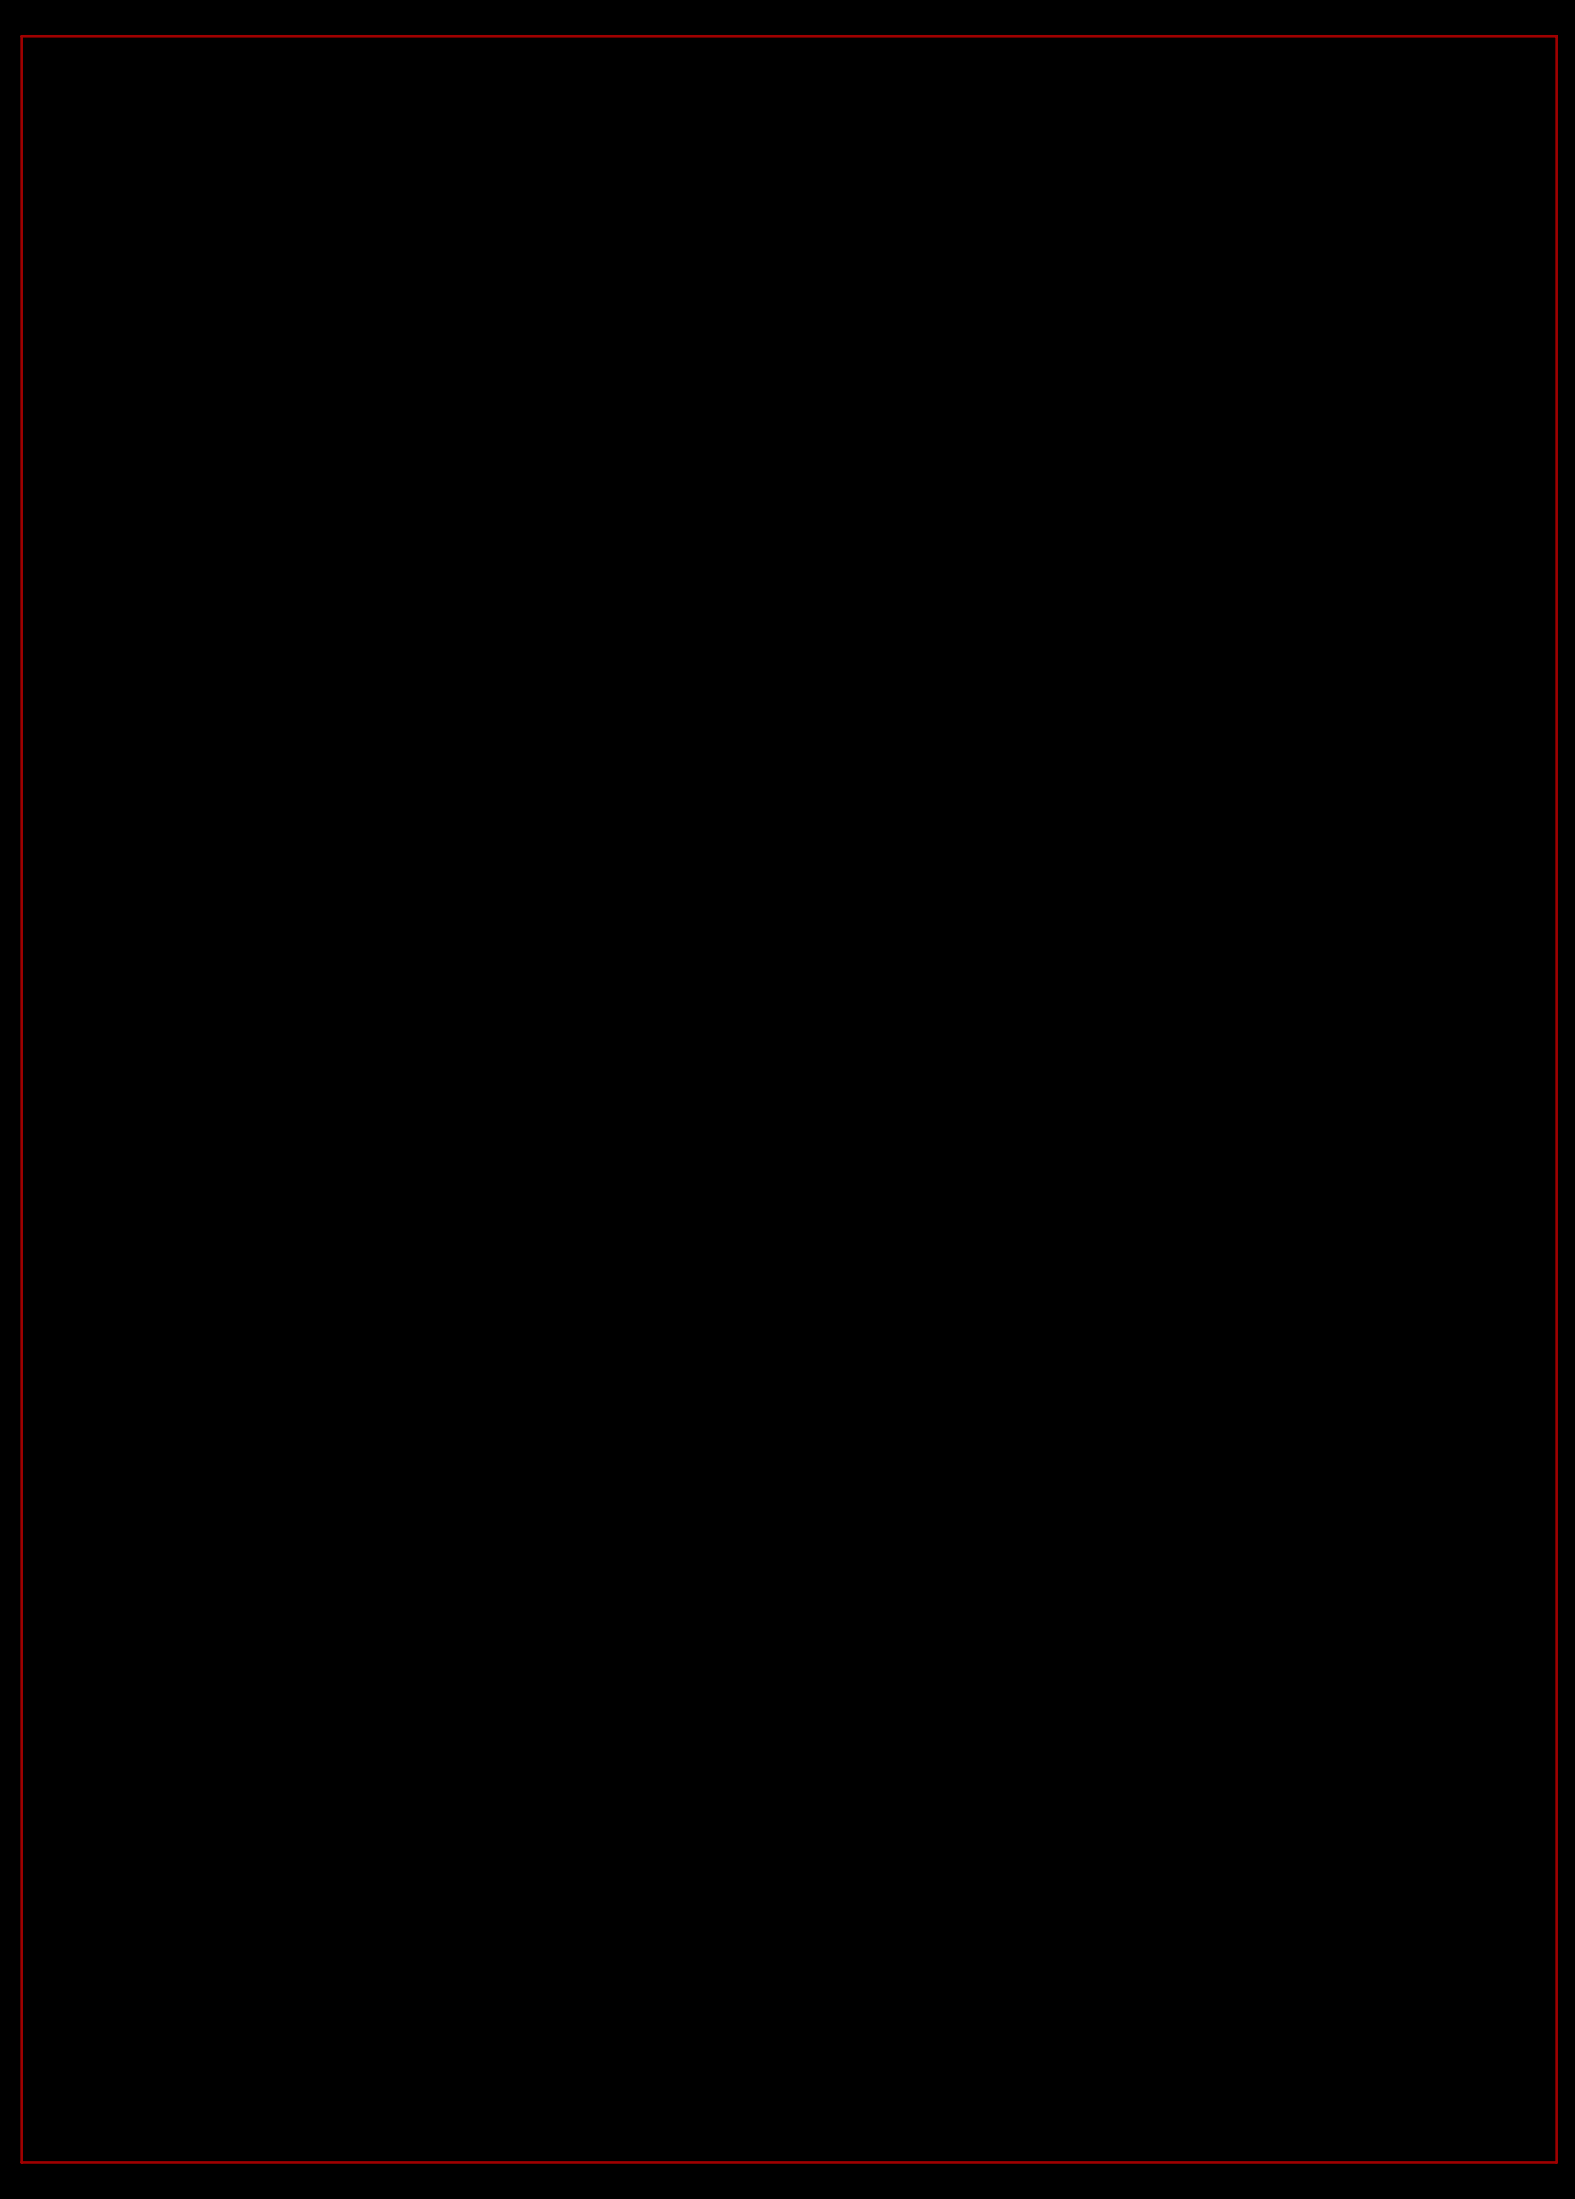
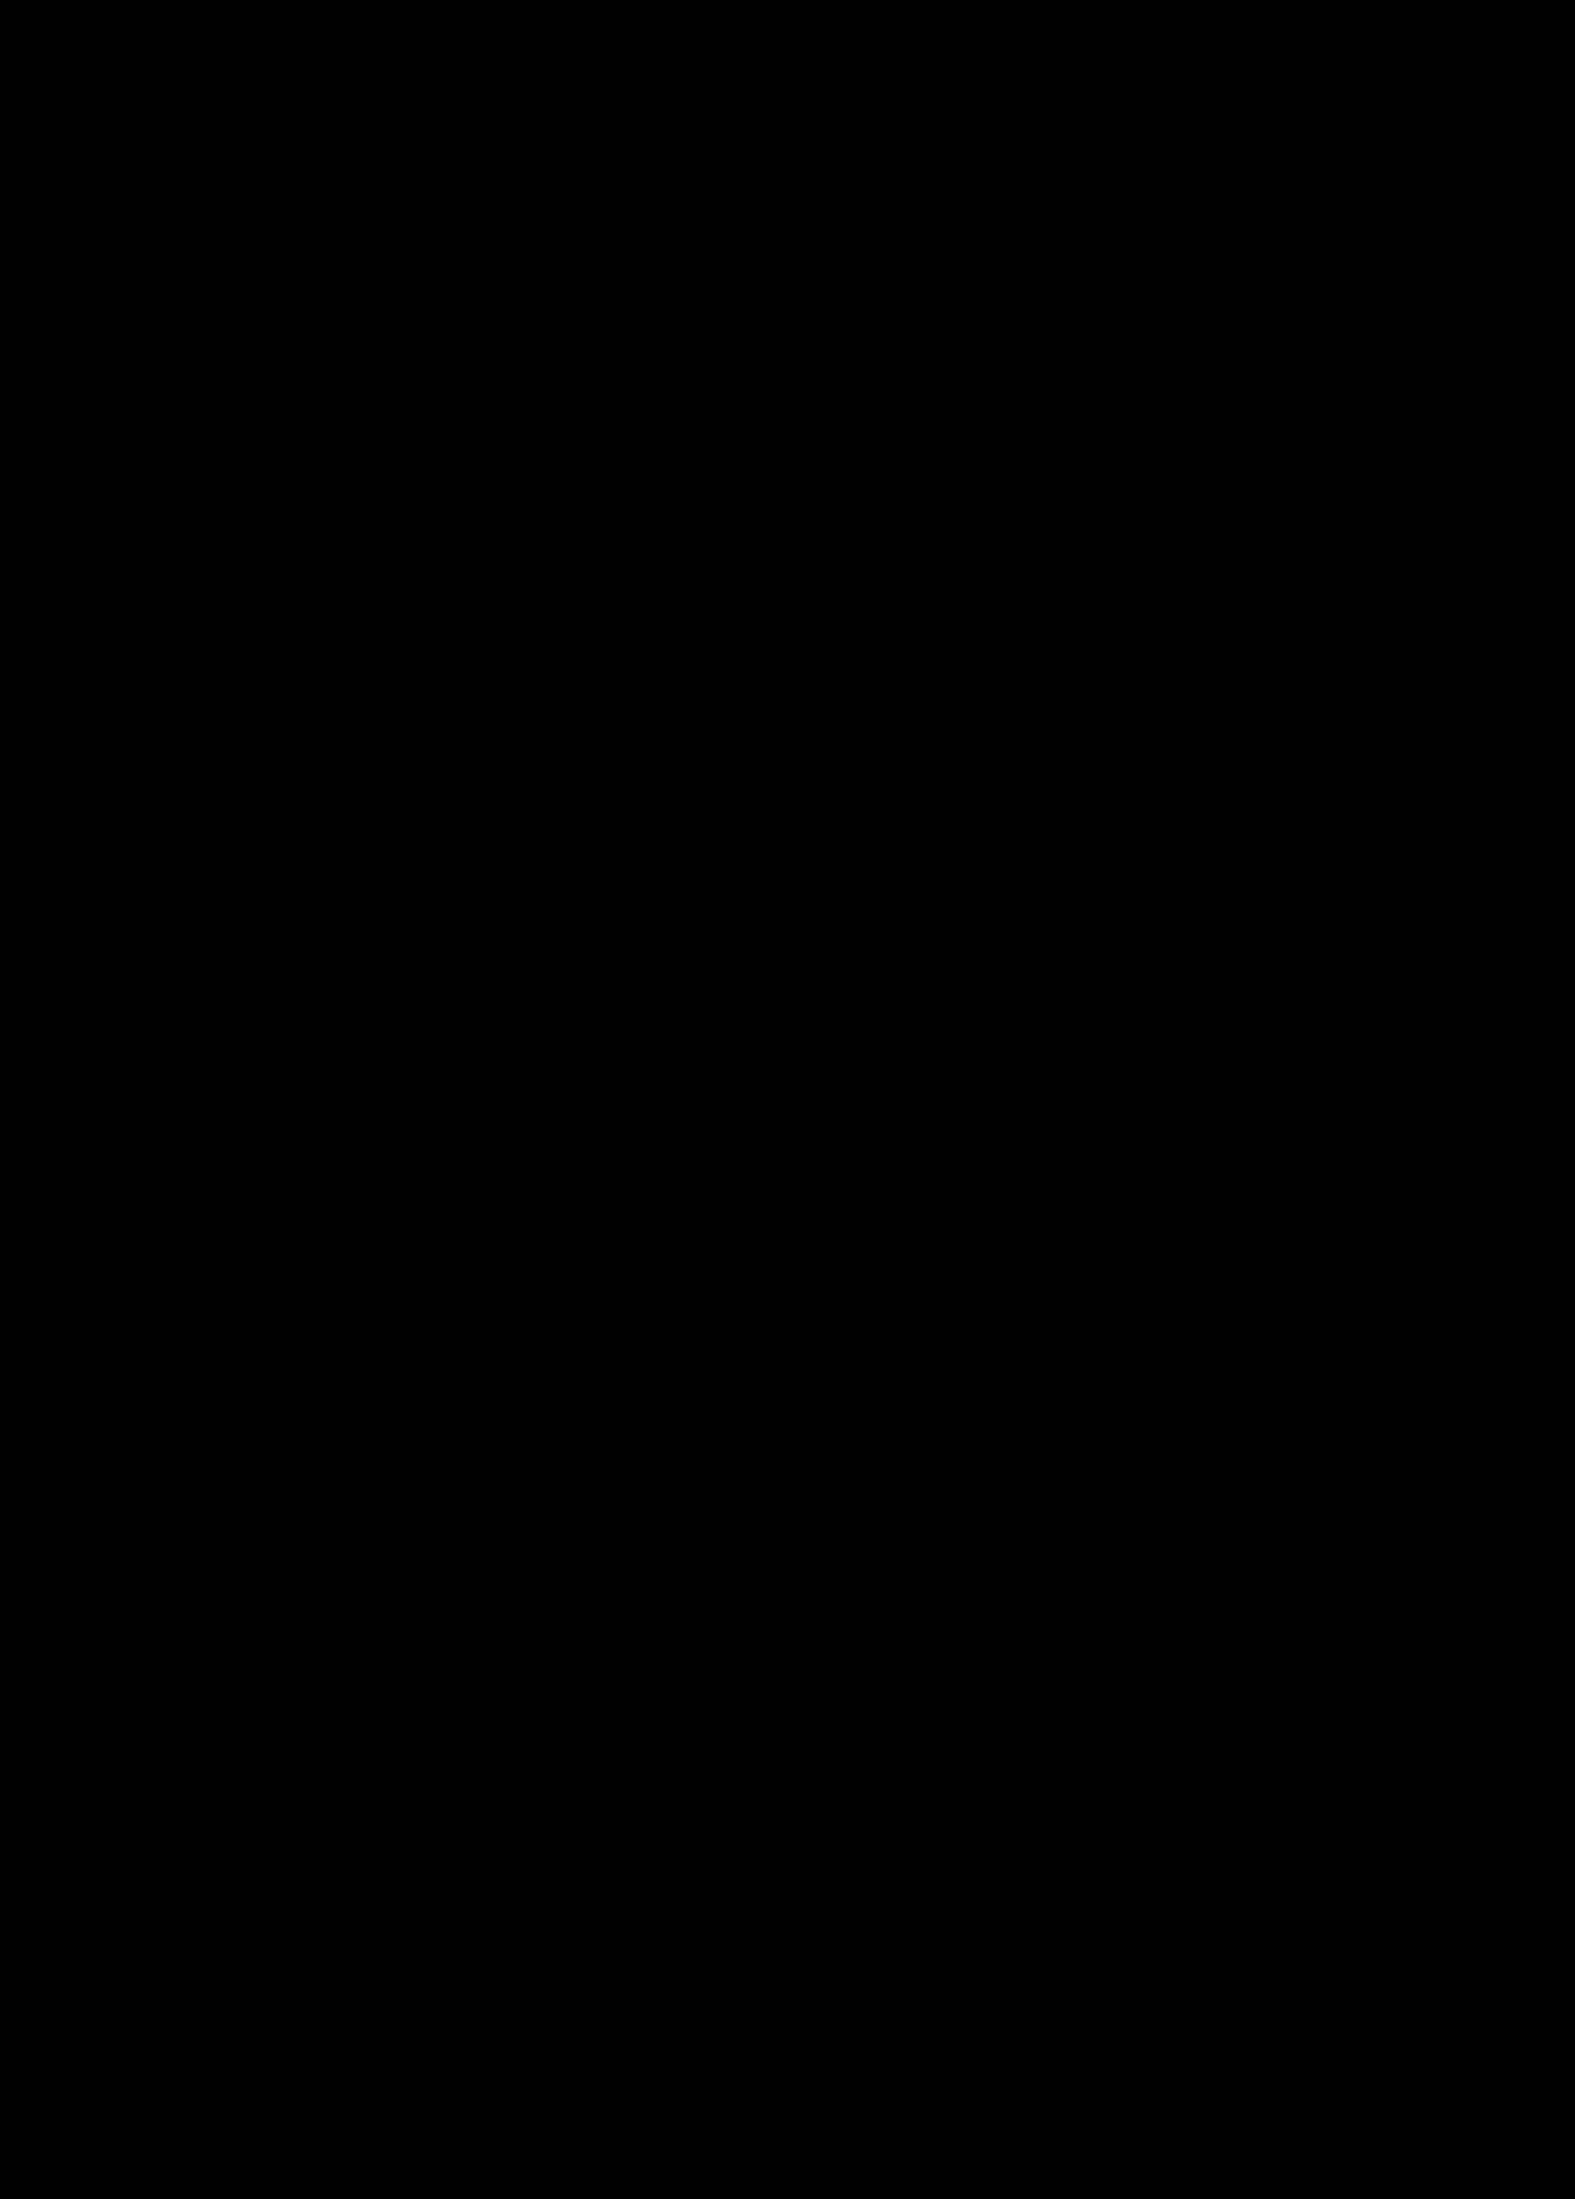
track: (21, 36) (1556, 36) (1556, 2162) (21, 2162) (21, 36) -> none

